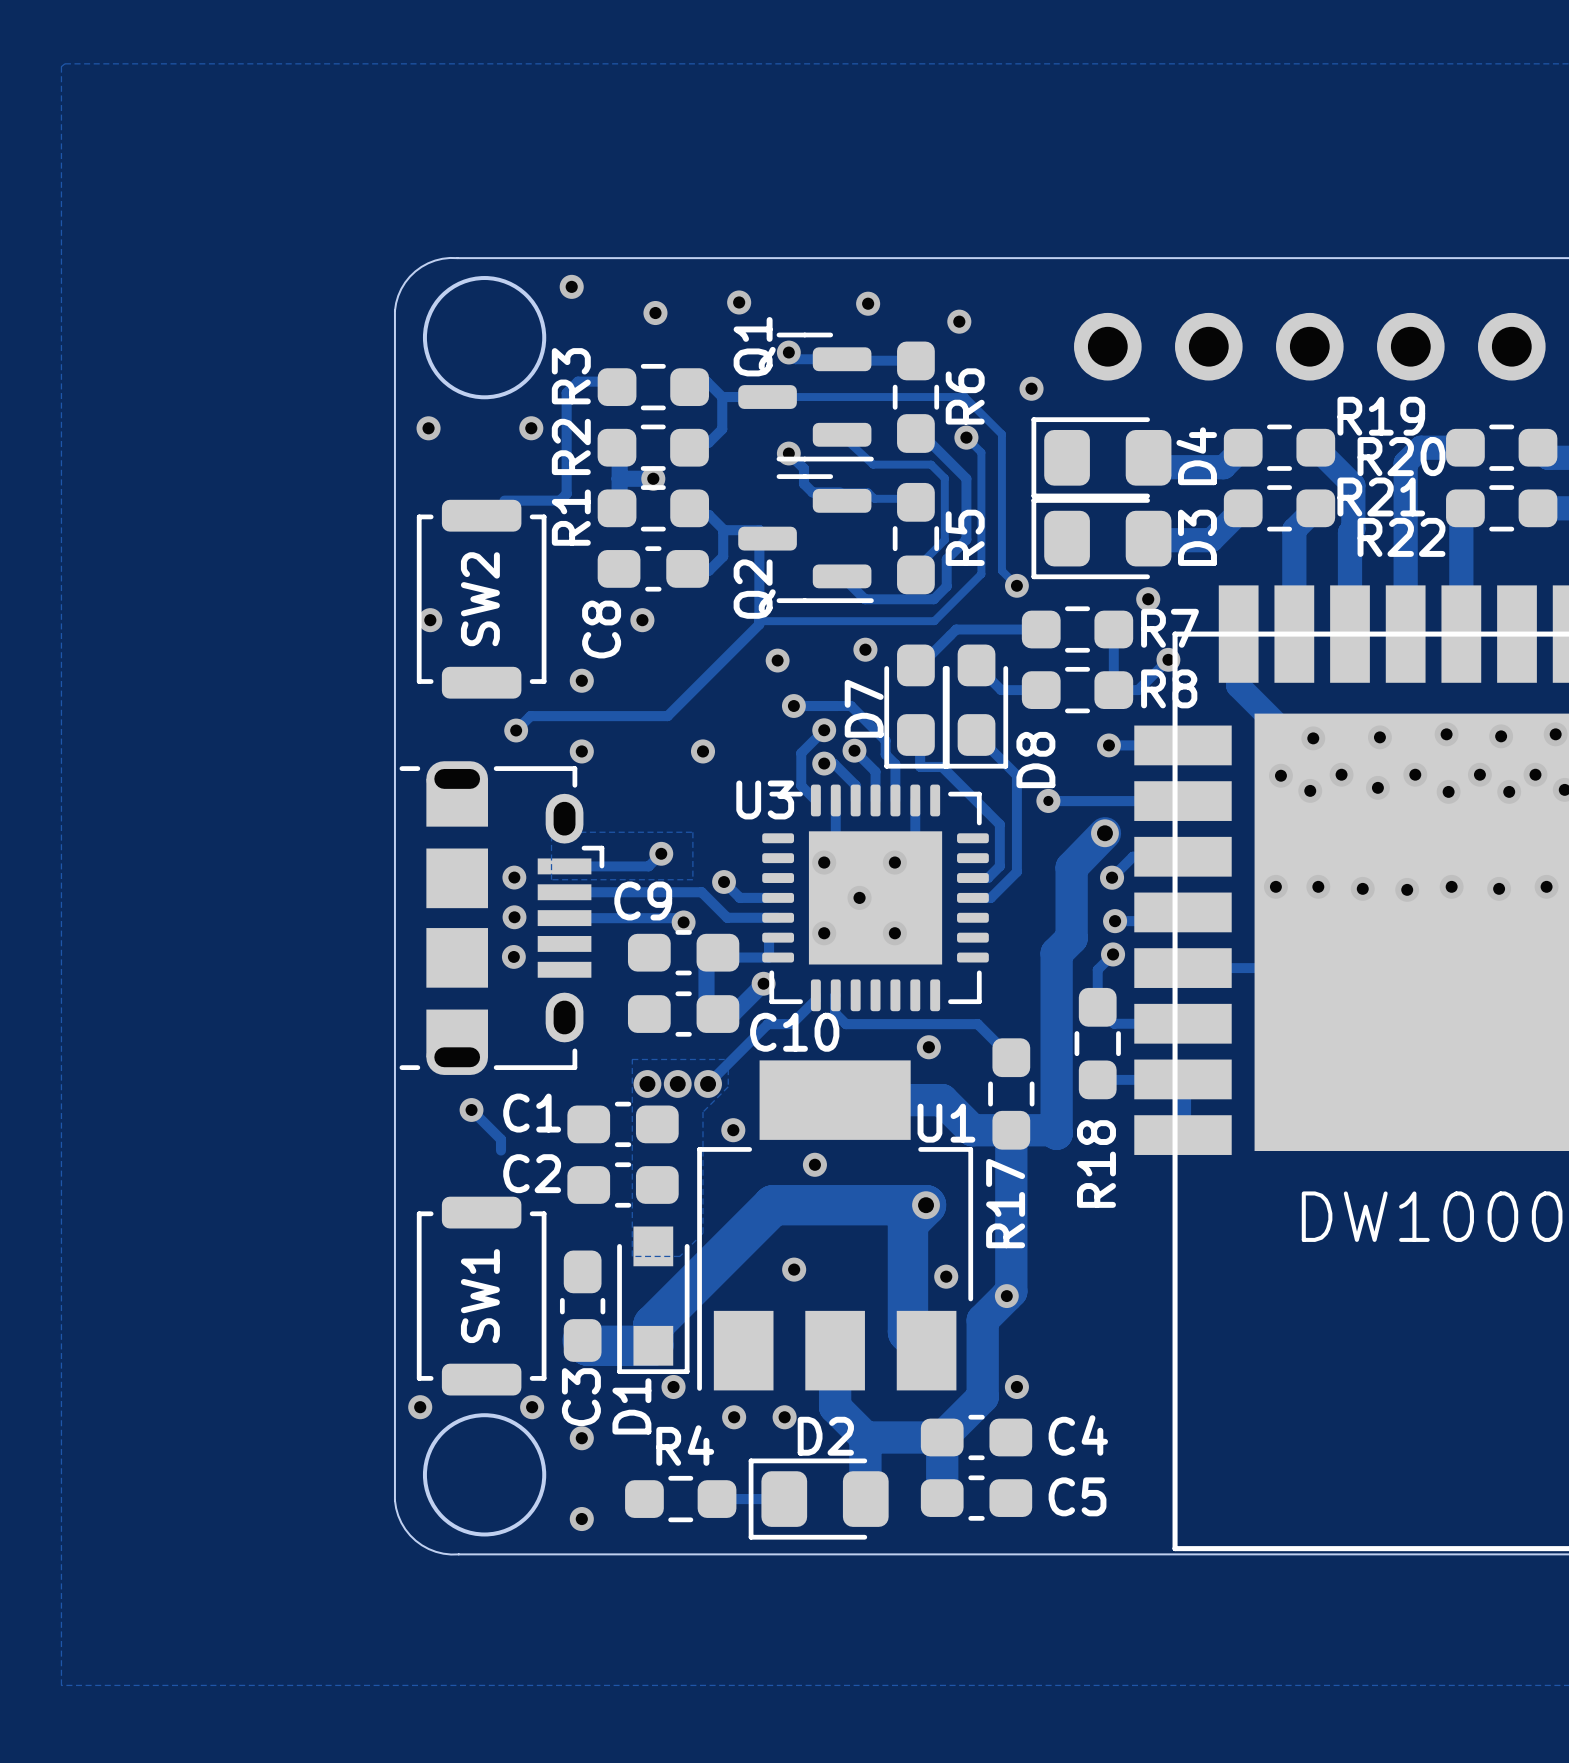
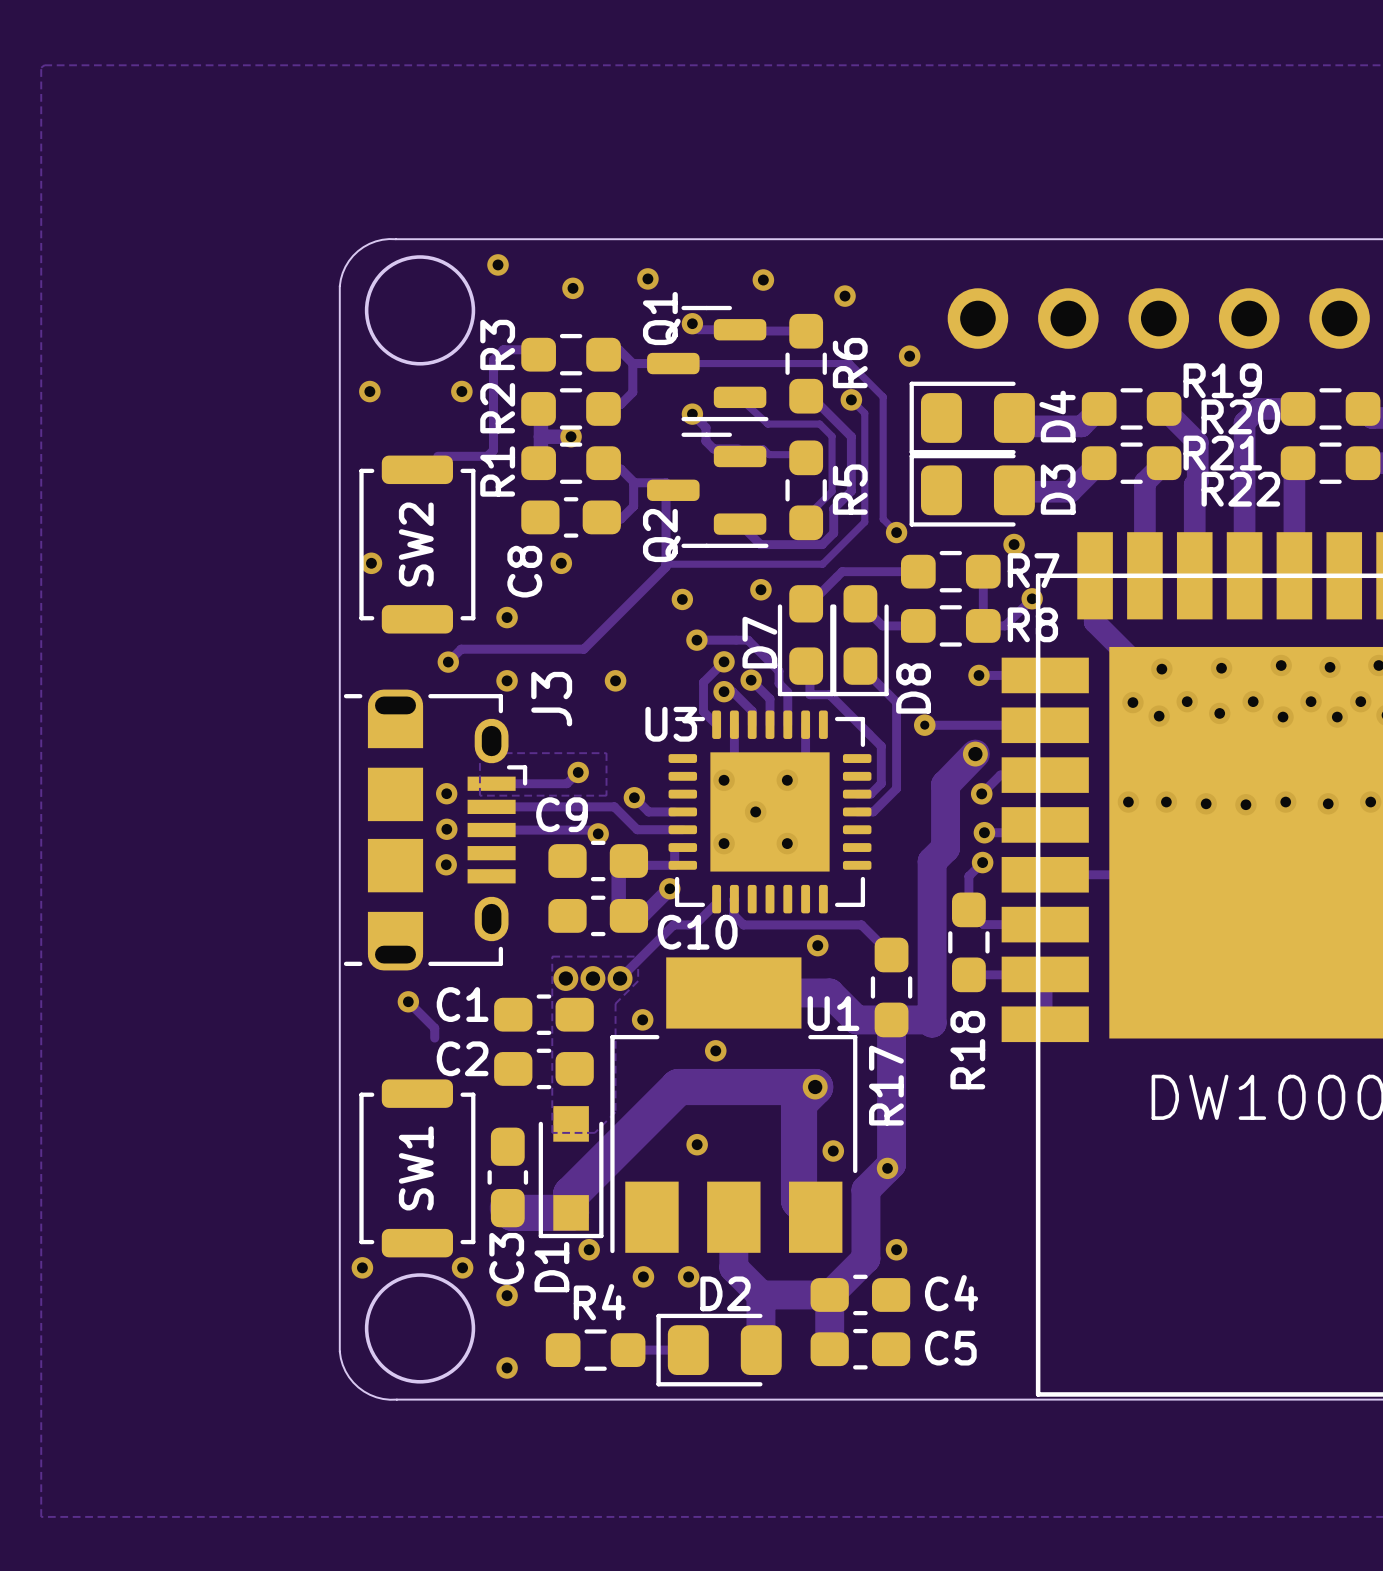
J3 name: none -> J3 (551, 699)

